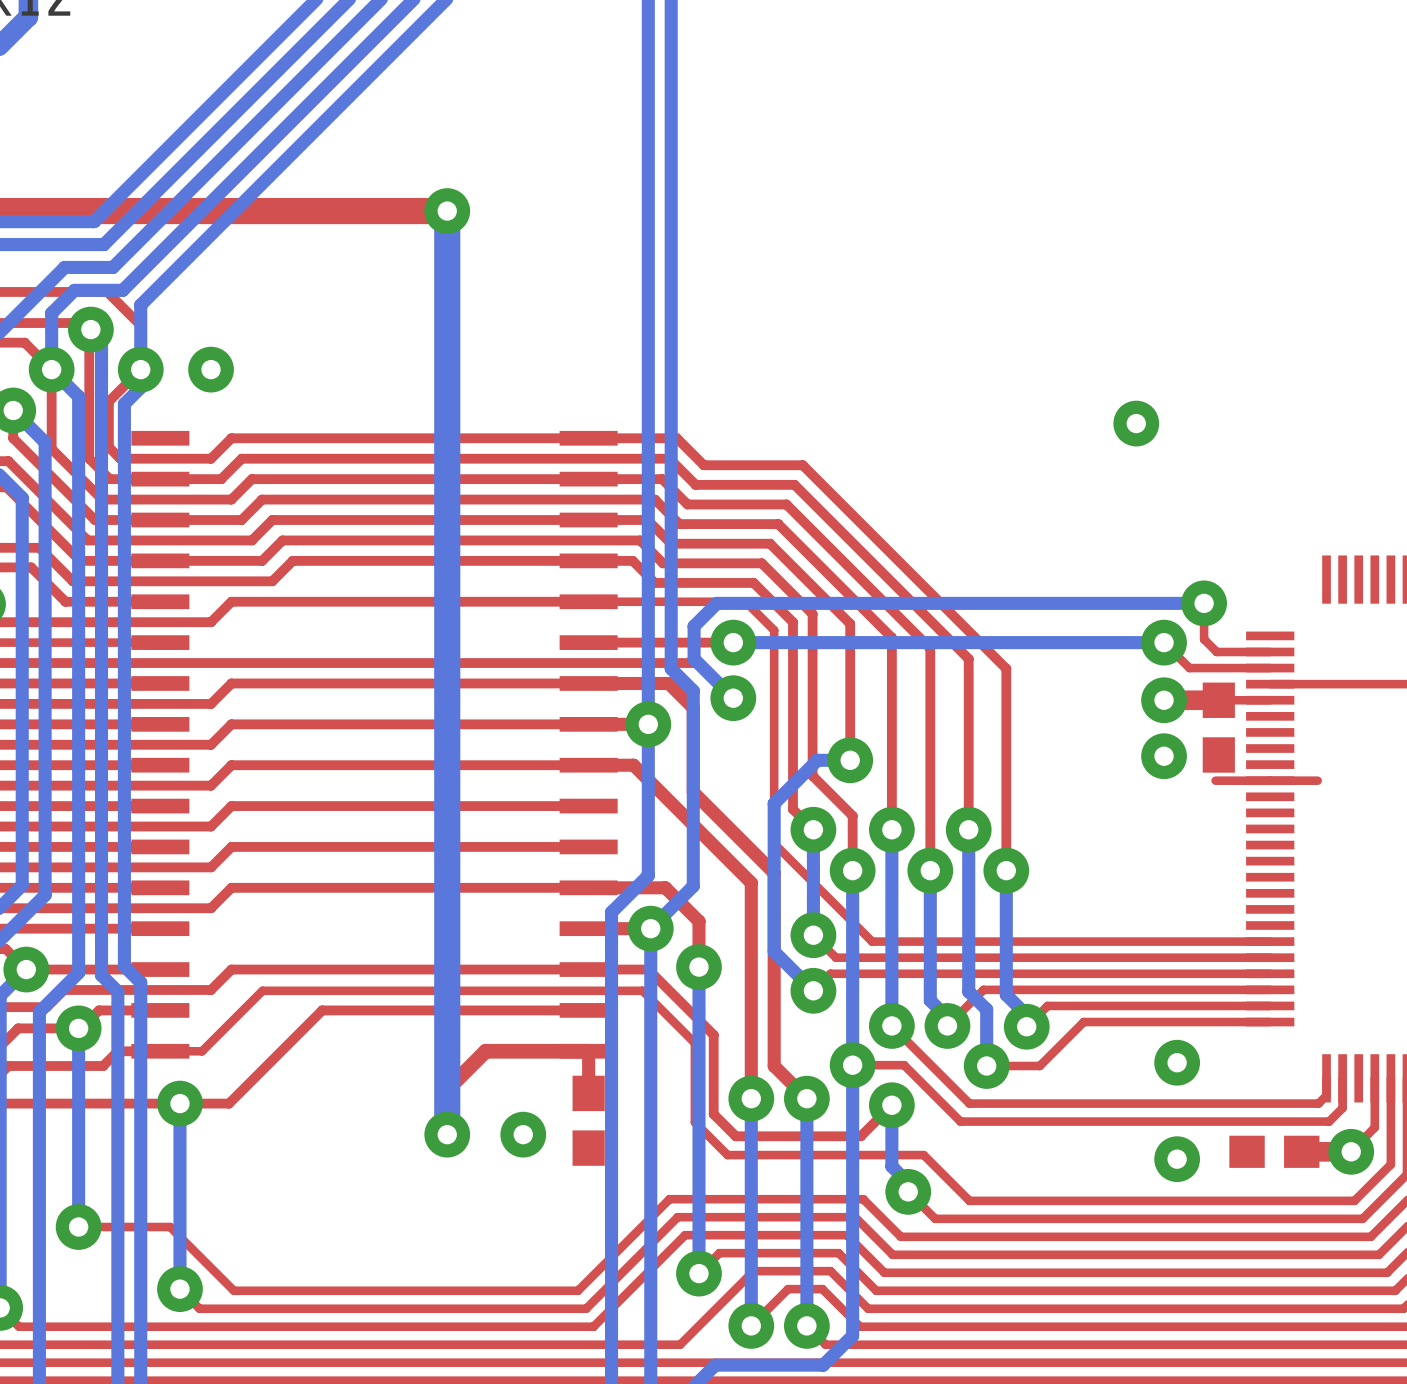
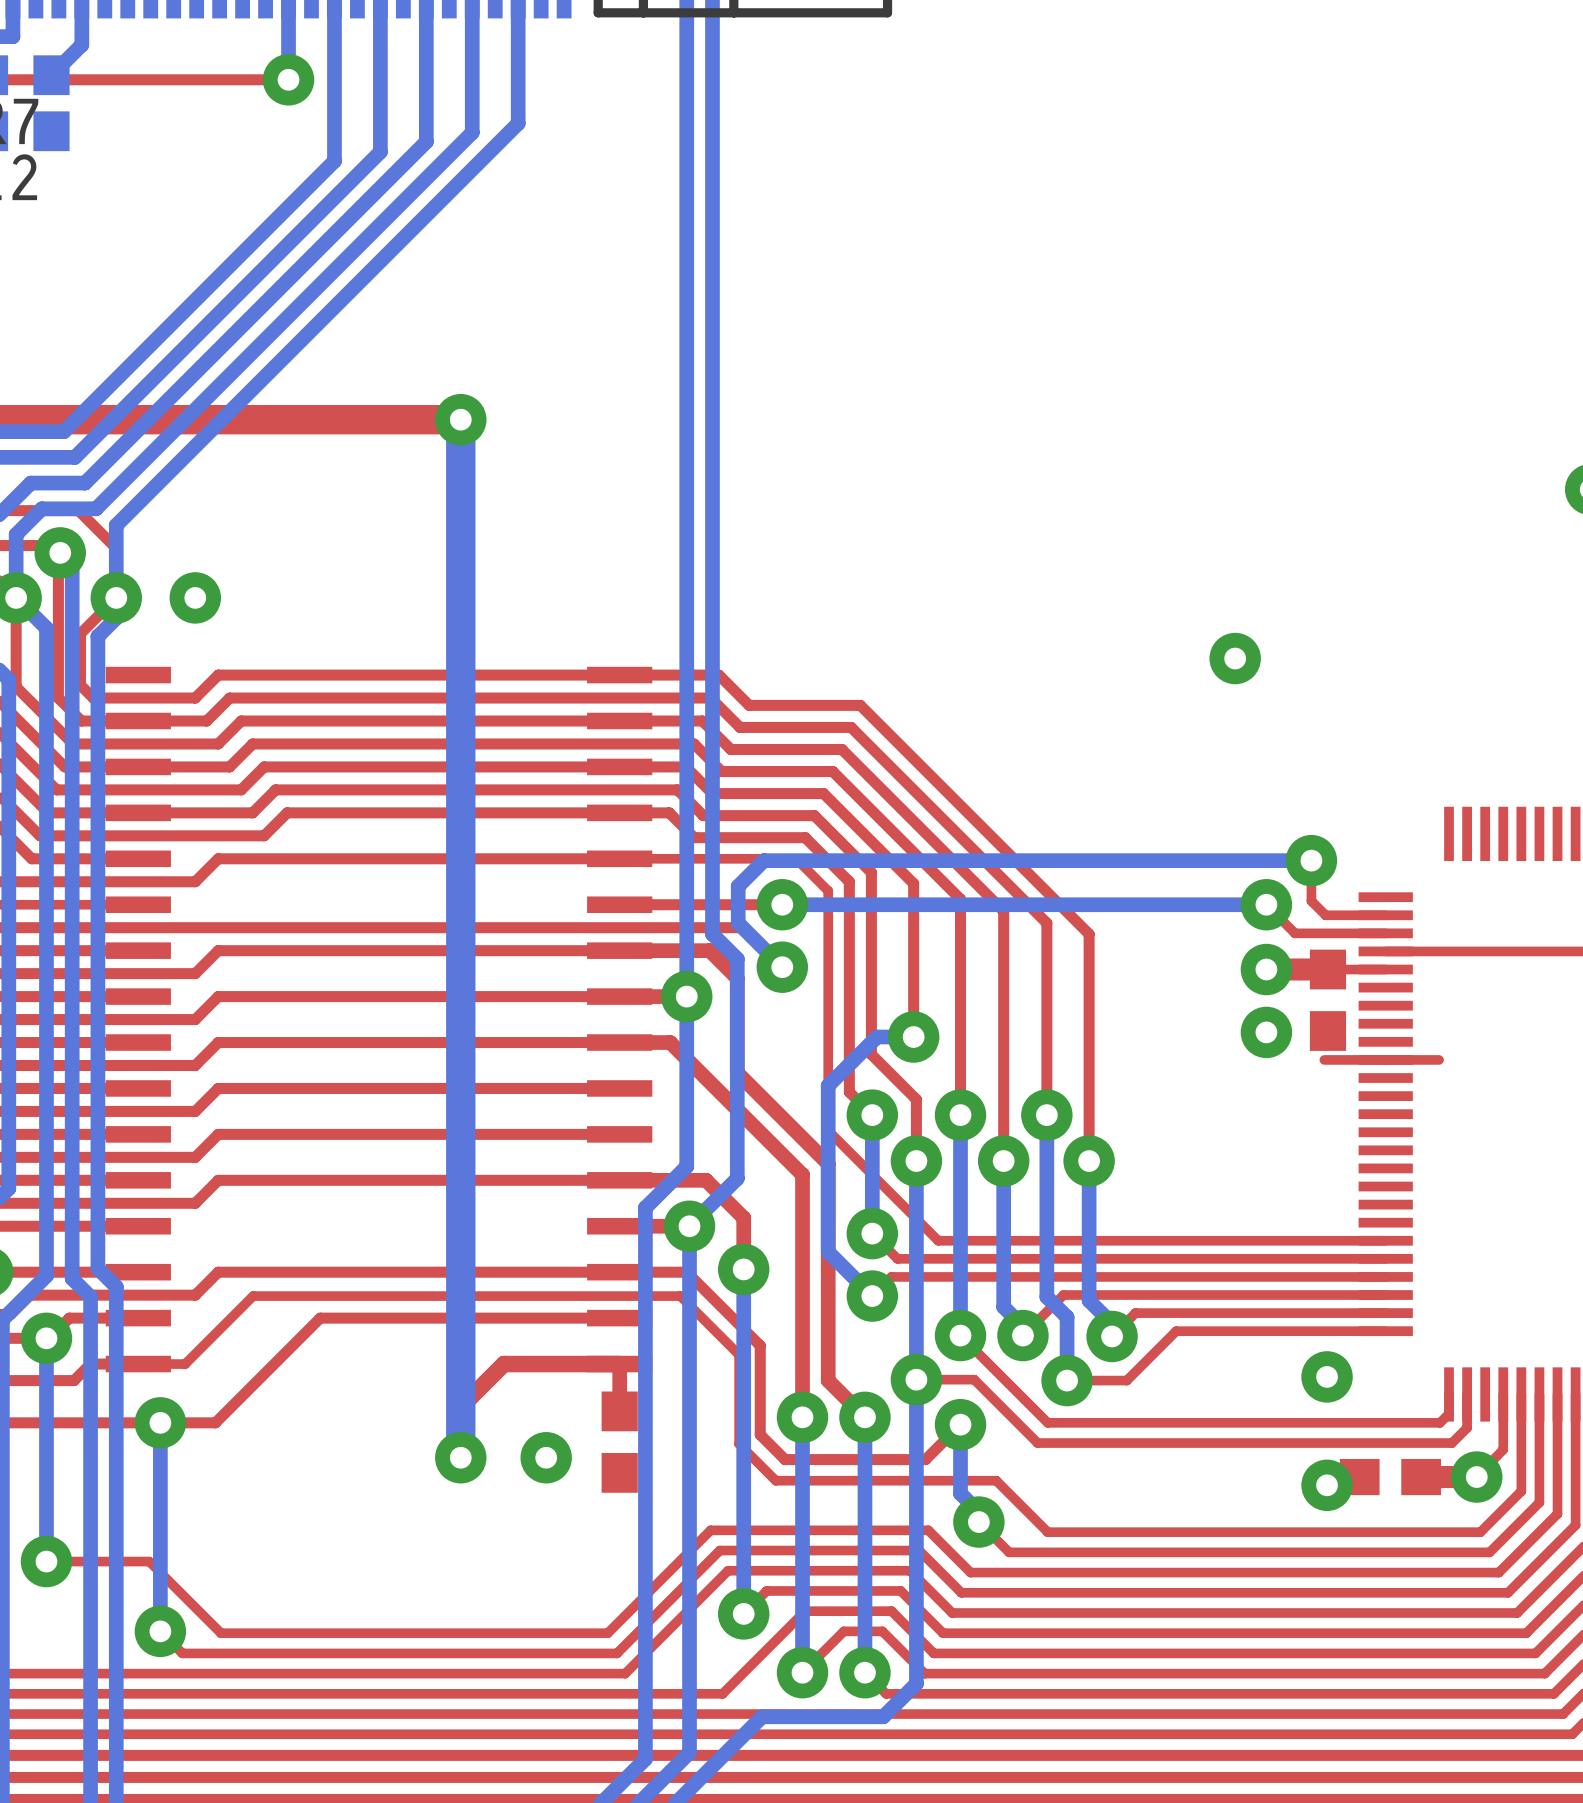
via position: (1177, 1062) -> (1327, 1376)
via position: (1177, 1159) -> (1327, 1485)

